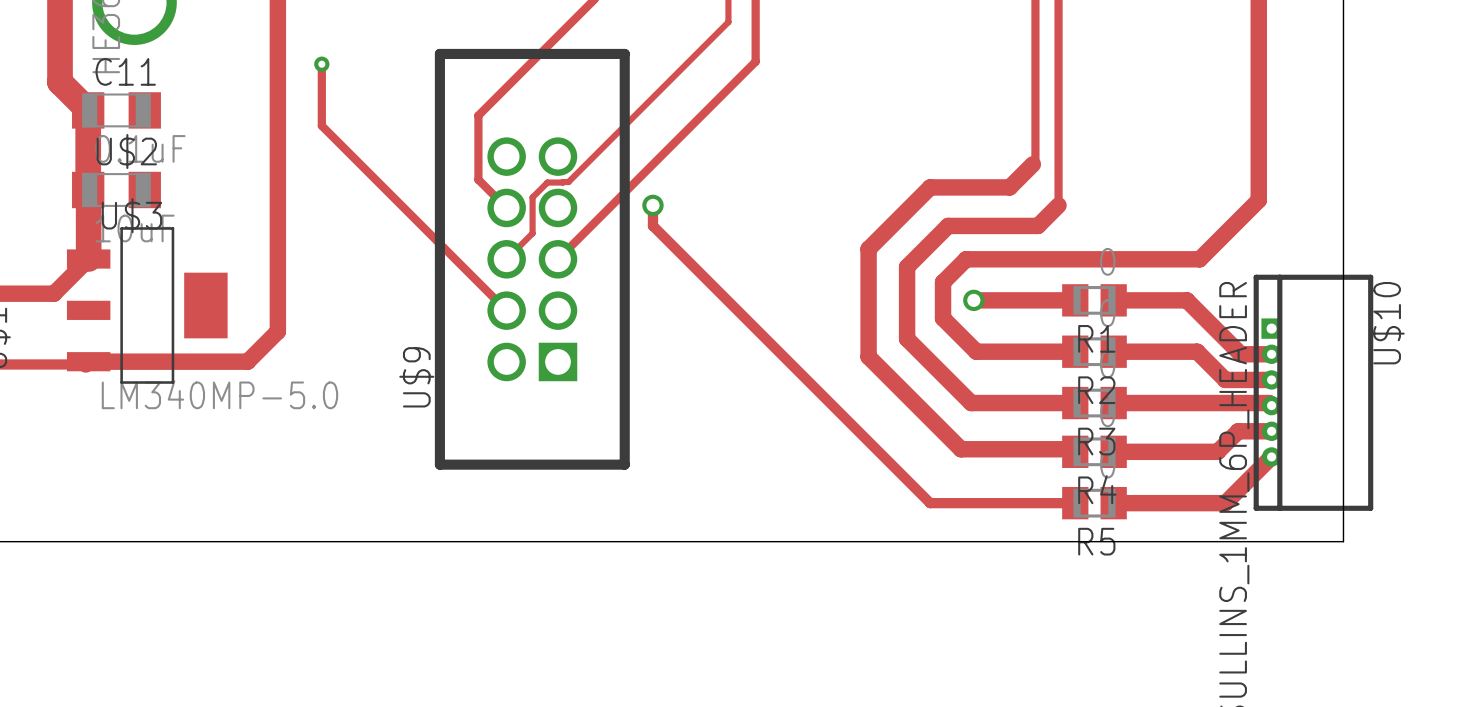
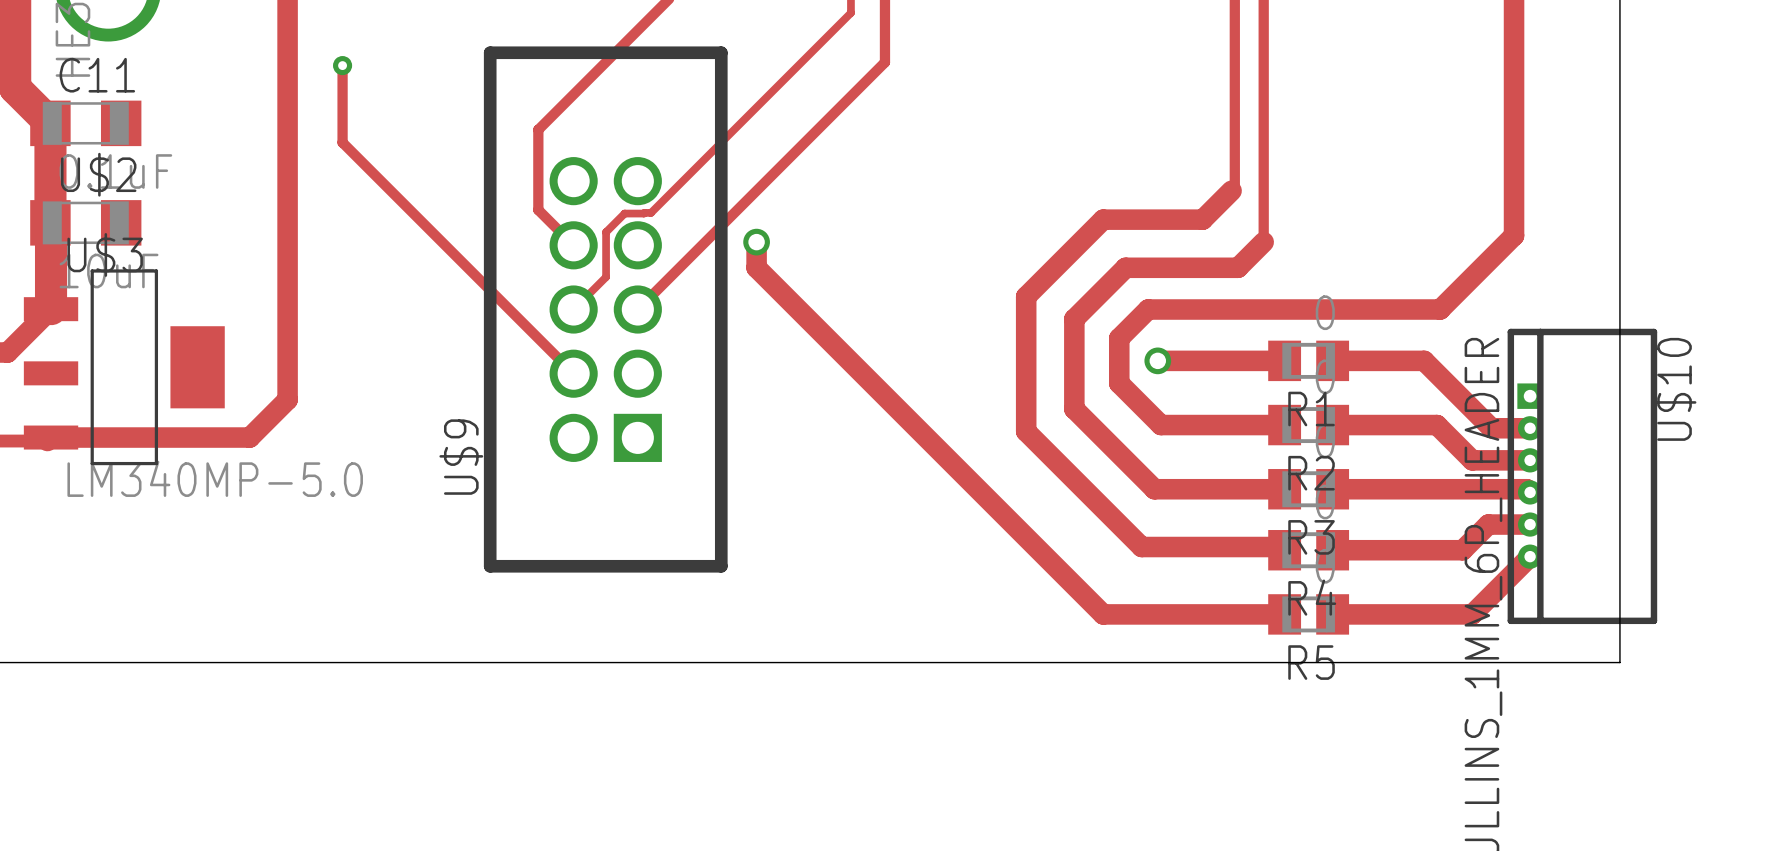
track width: thin (652, 205) (652, 225) (930, 503) (1075, 503) -> thick (756, 242) (756, 267) (1103, 614) (1284, 614)

